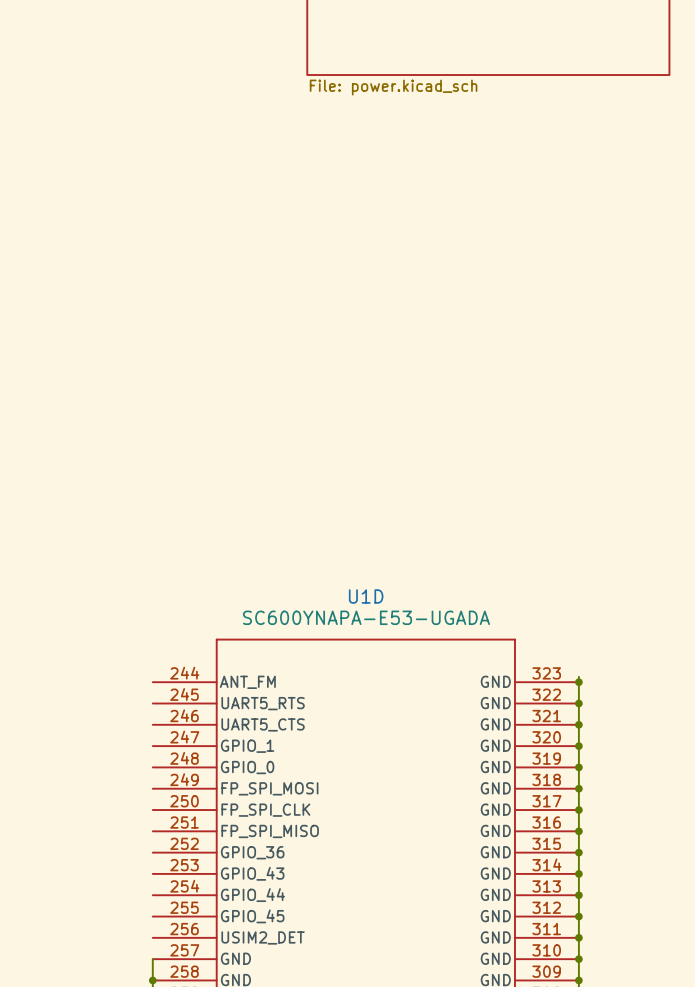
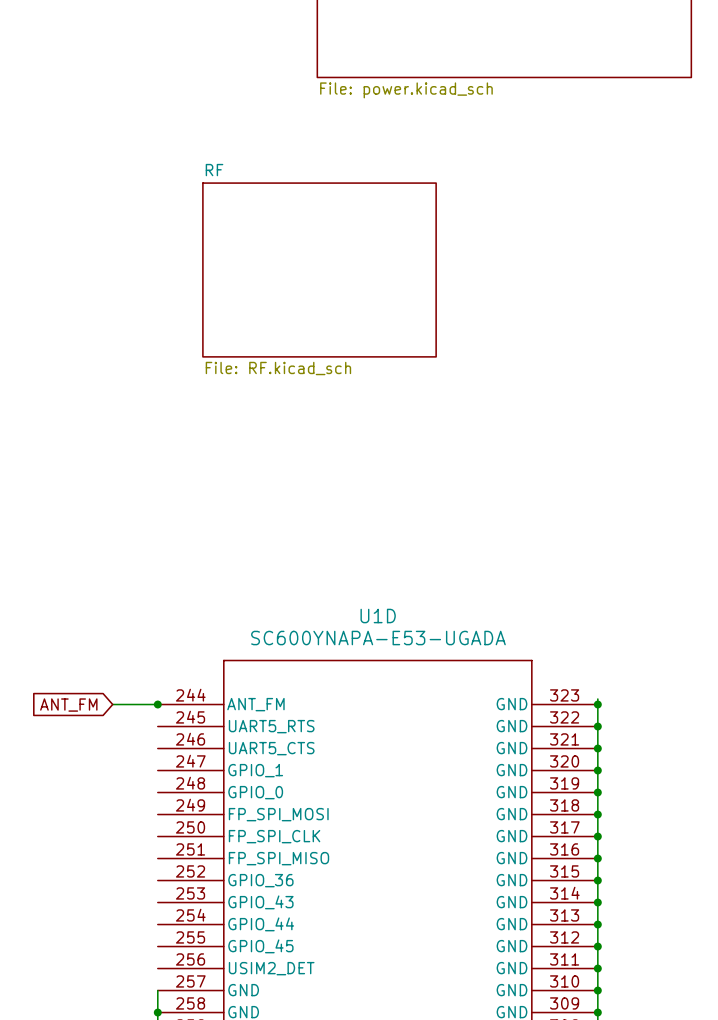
sheet RF: none -> File: RF.kicad_sch (319, 269)
global label: none -> ANT_FM (68, 705)
wire: none -> (112, 704) (158, 704)
junction: none -> (157, 704)

